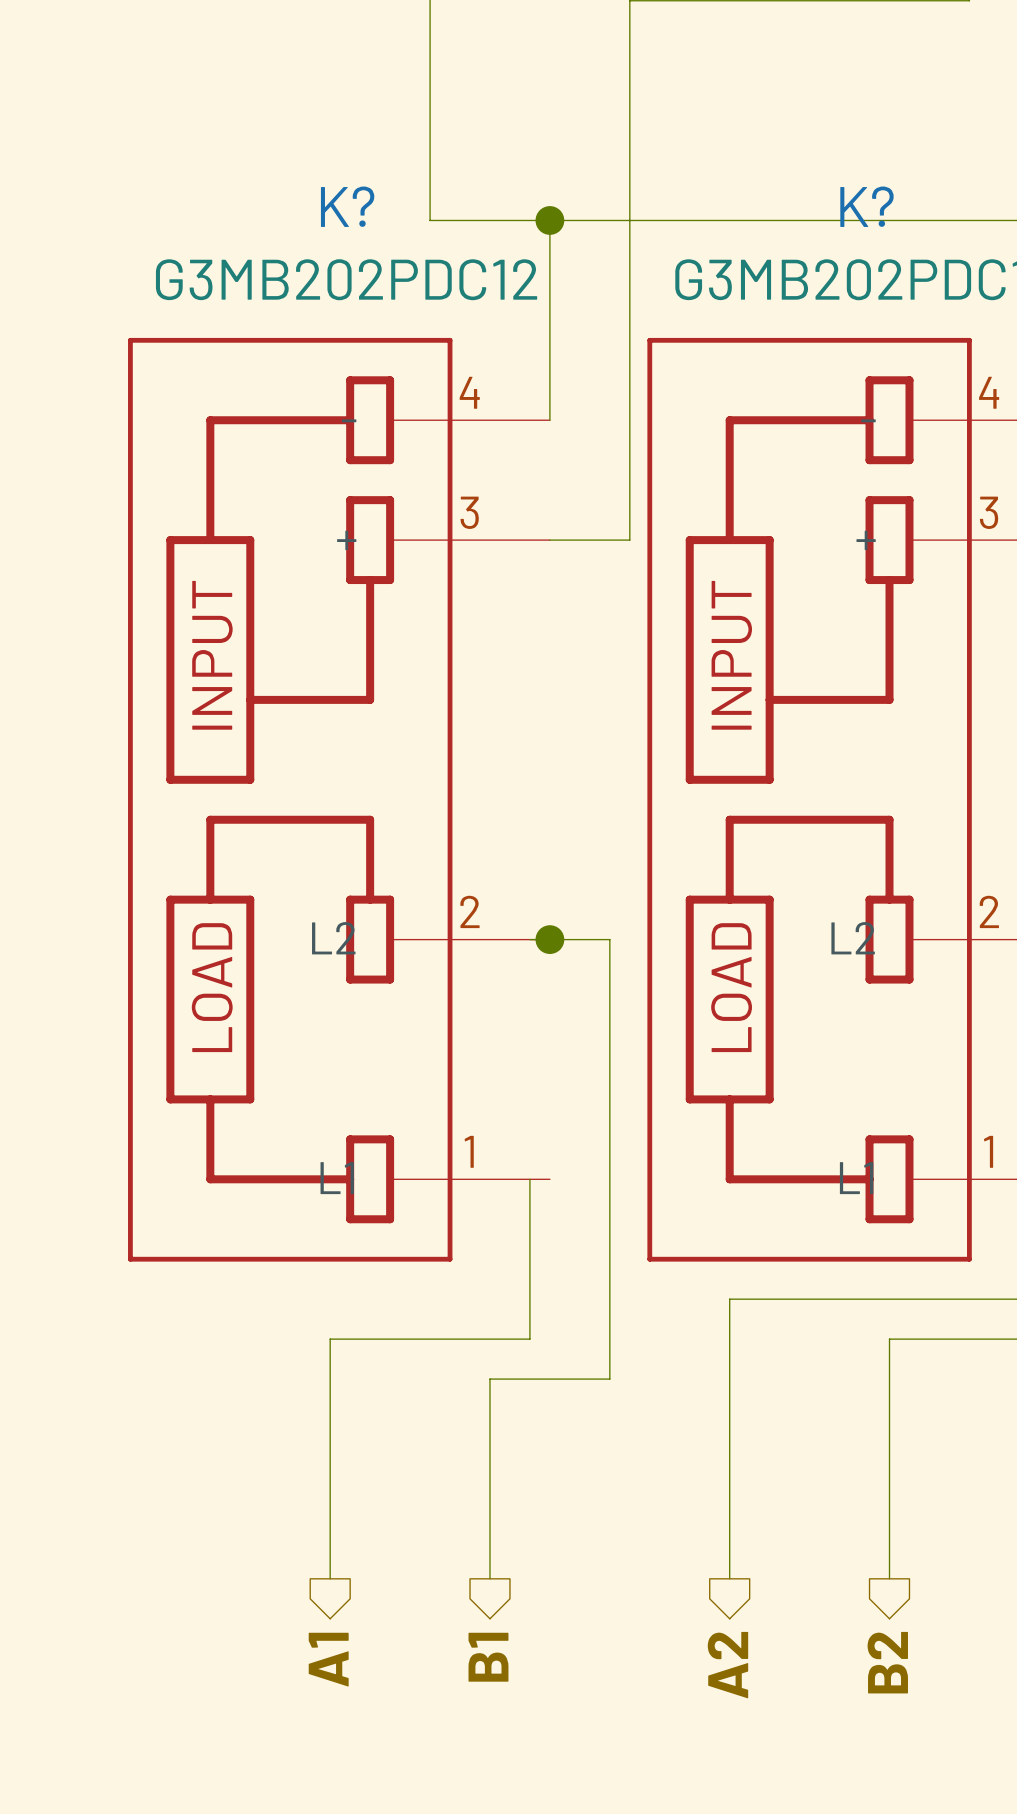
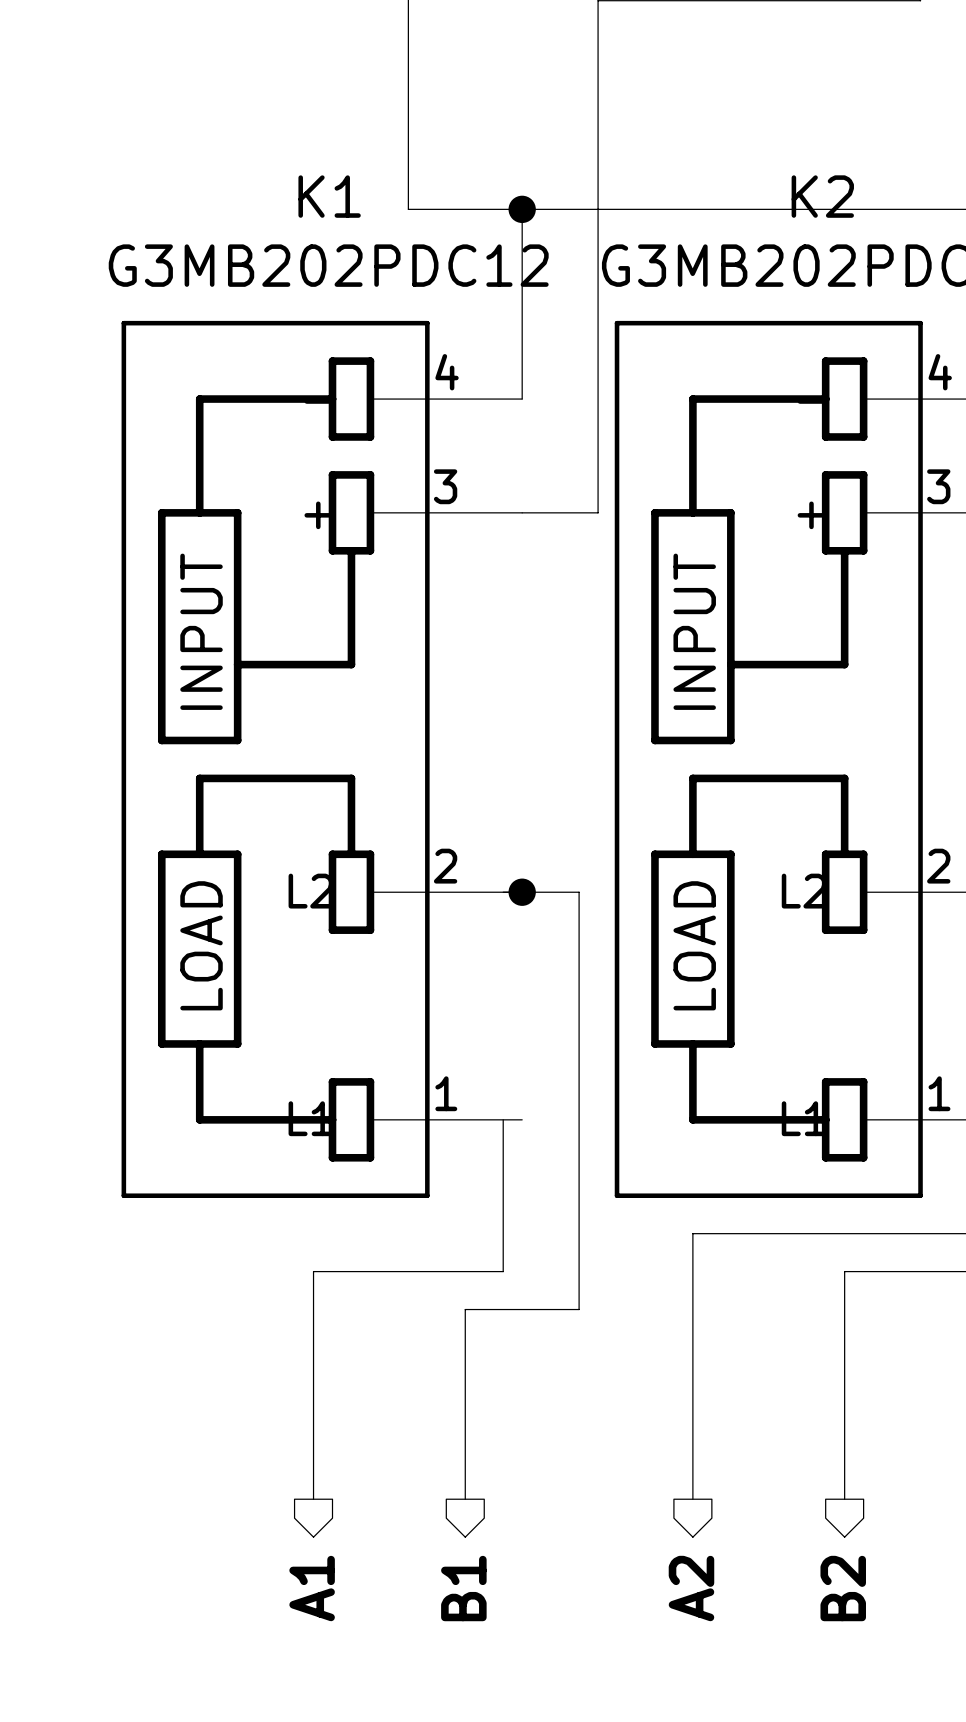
K? name: K? (347, 206) -> K1 (329, 196)
K? name: K? (866, 206) -> K2 (822, 196)

